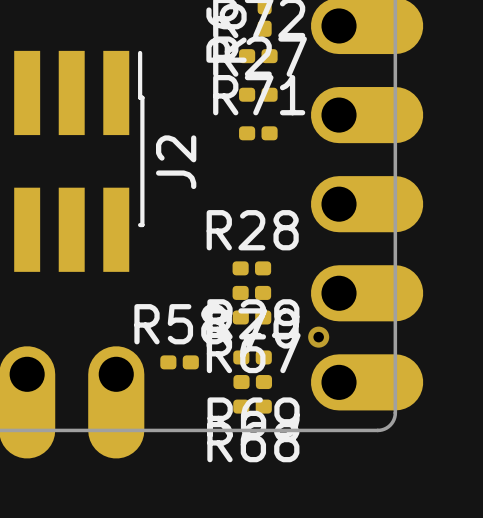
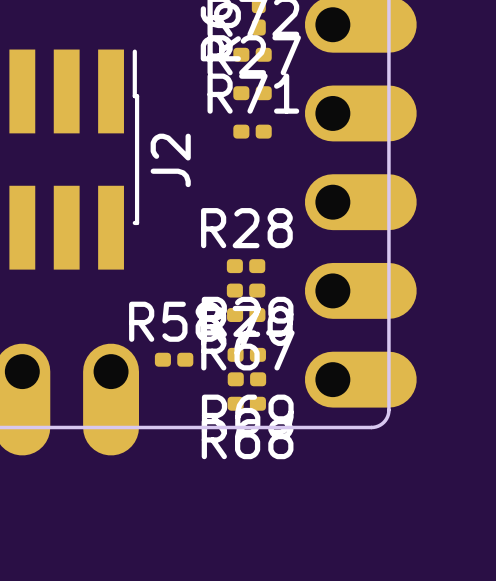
via: (318, 337) -> none

